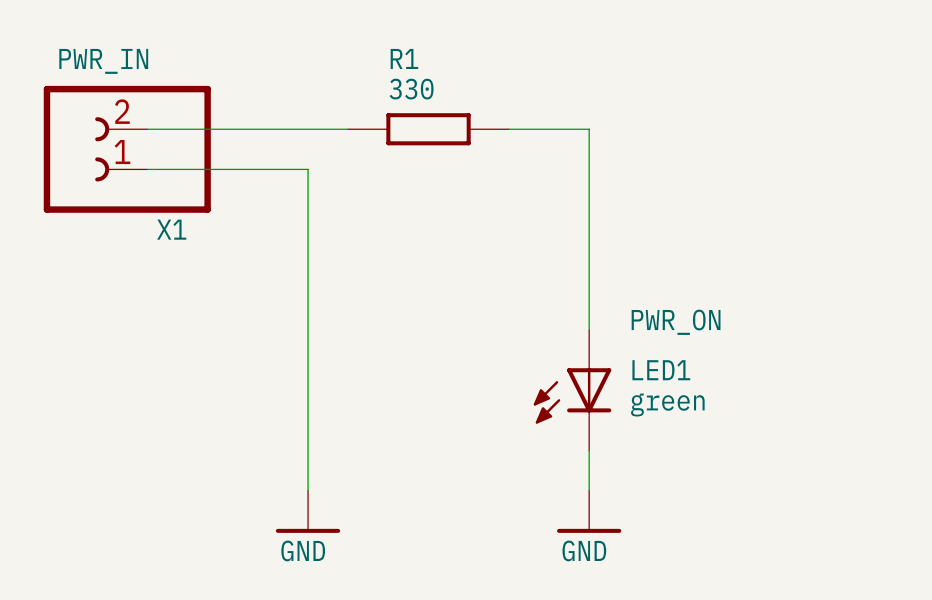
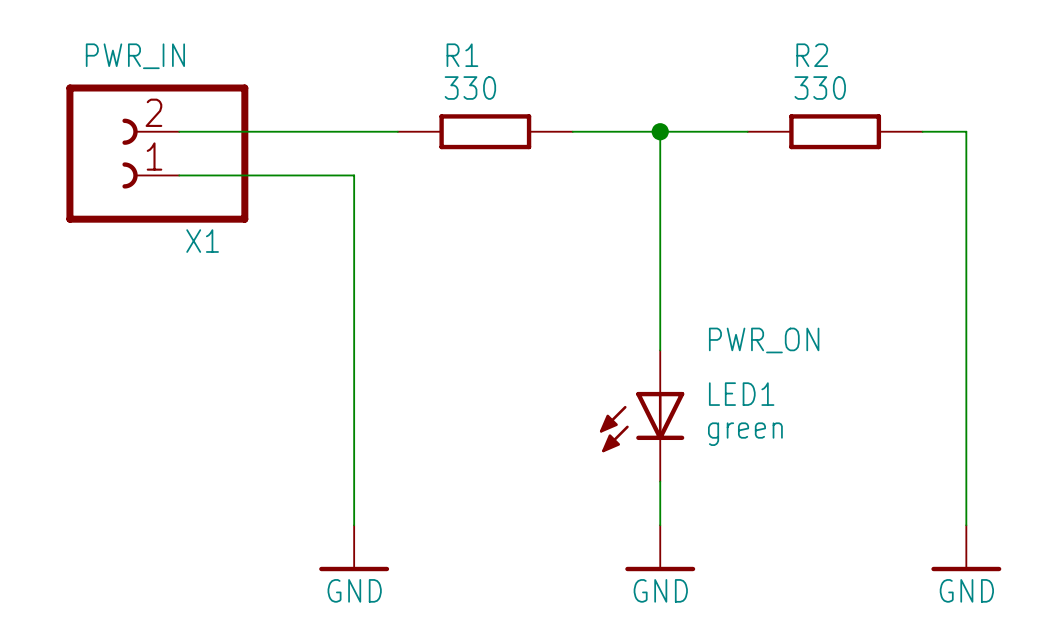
wire: none -> (660, 131) (747, 131)
junction: none -> (660, 131)
R2: none -> 330 (835, 131)
wire: none -> (922, 131) (966, 131) (966, 525)
power symbol: none -> GND (966, 548)

